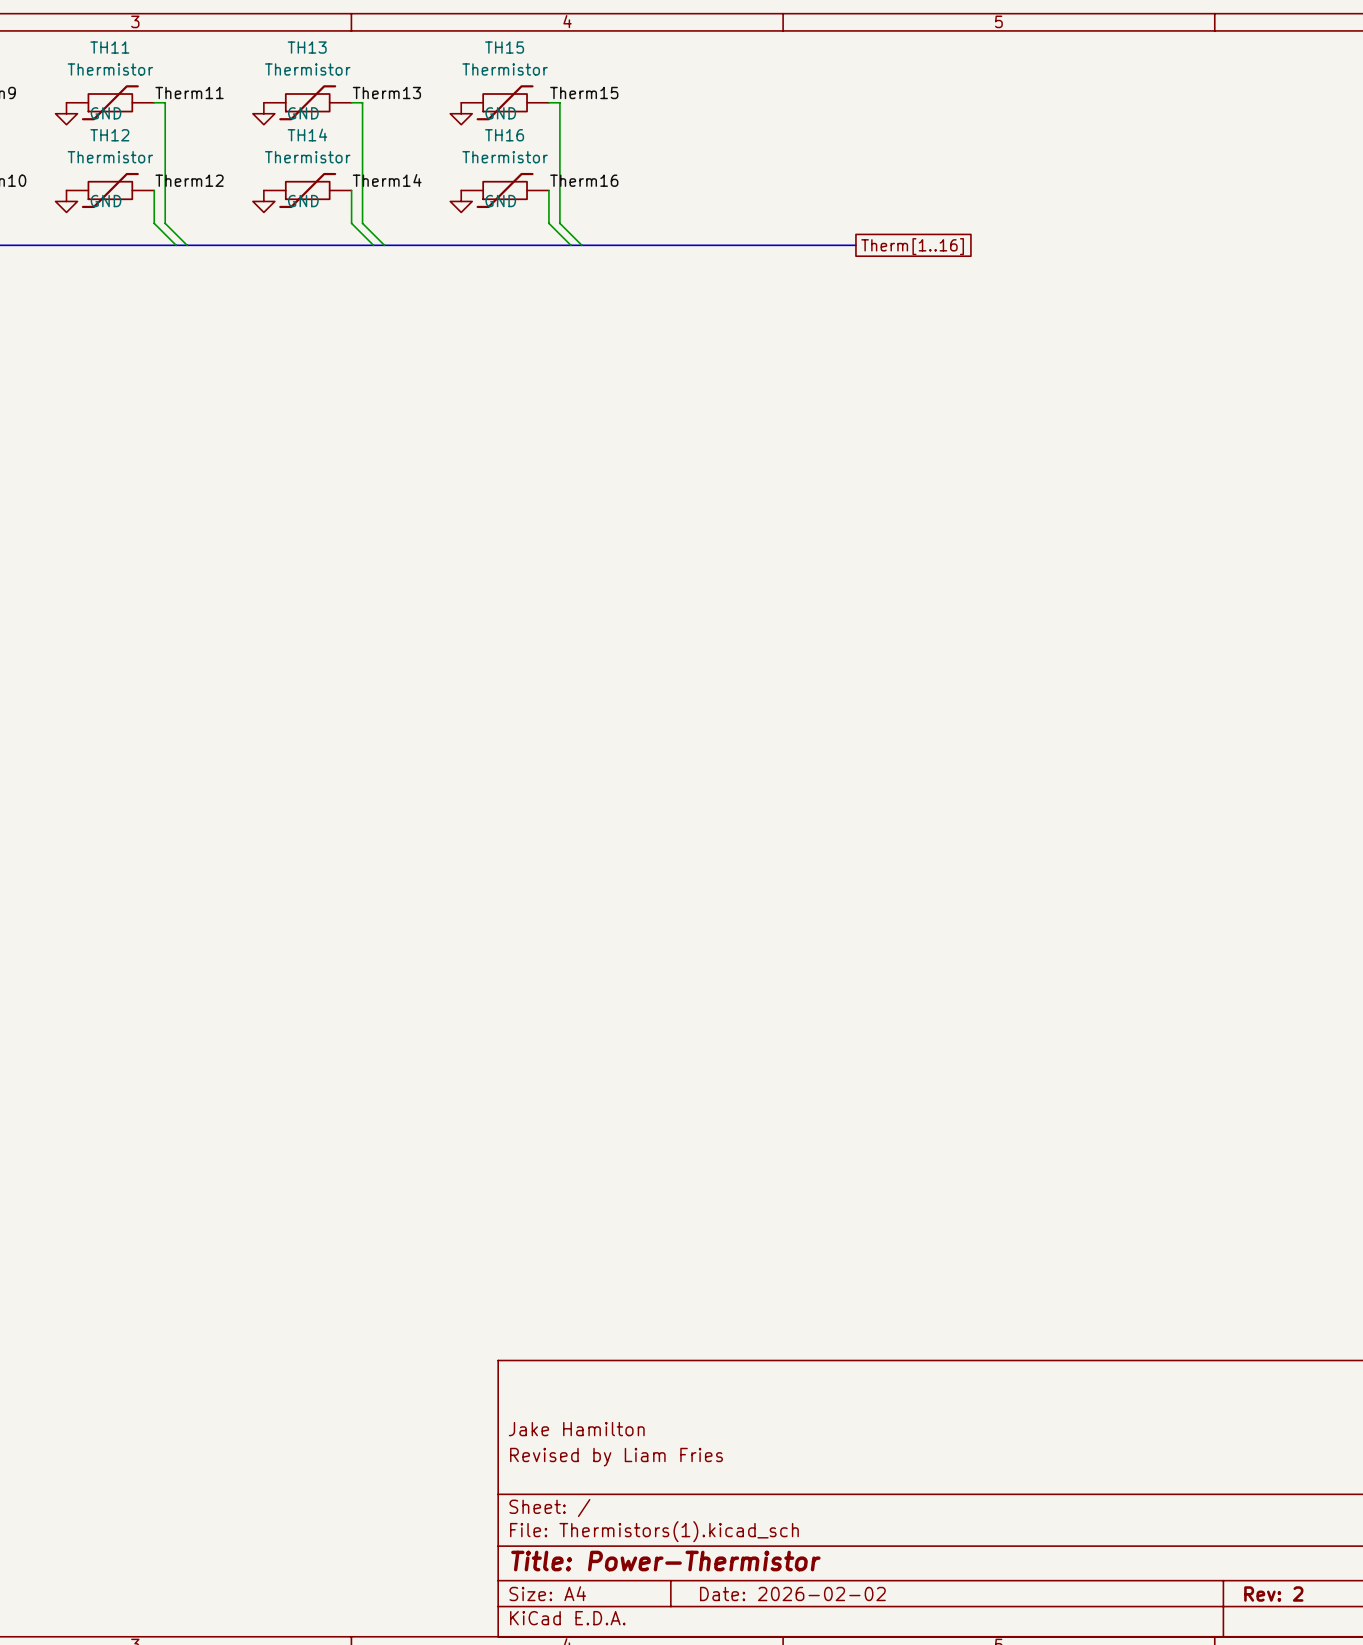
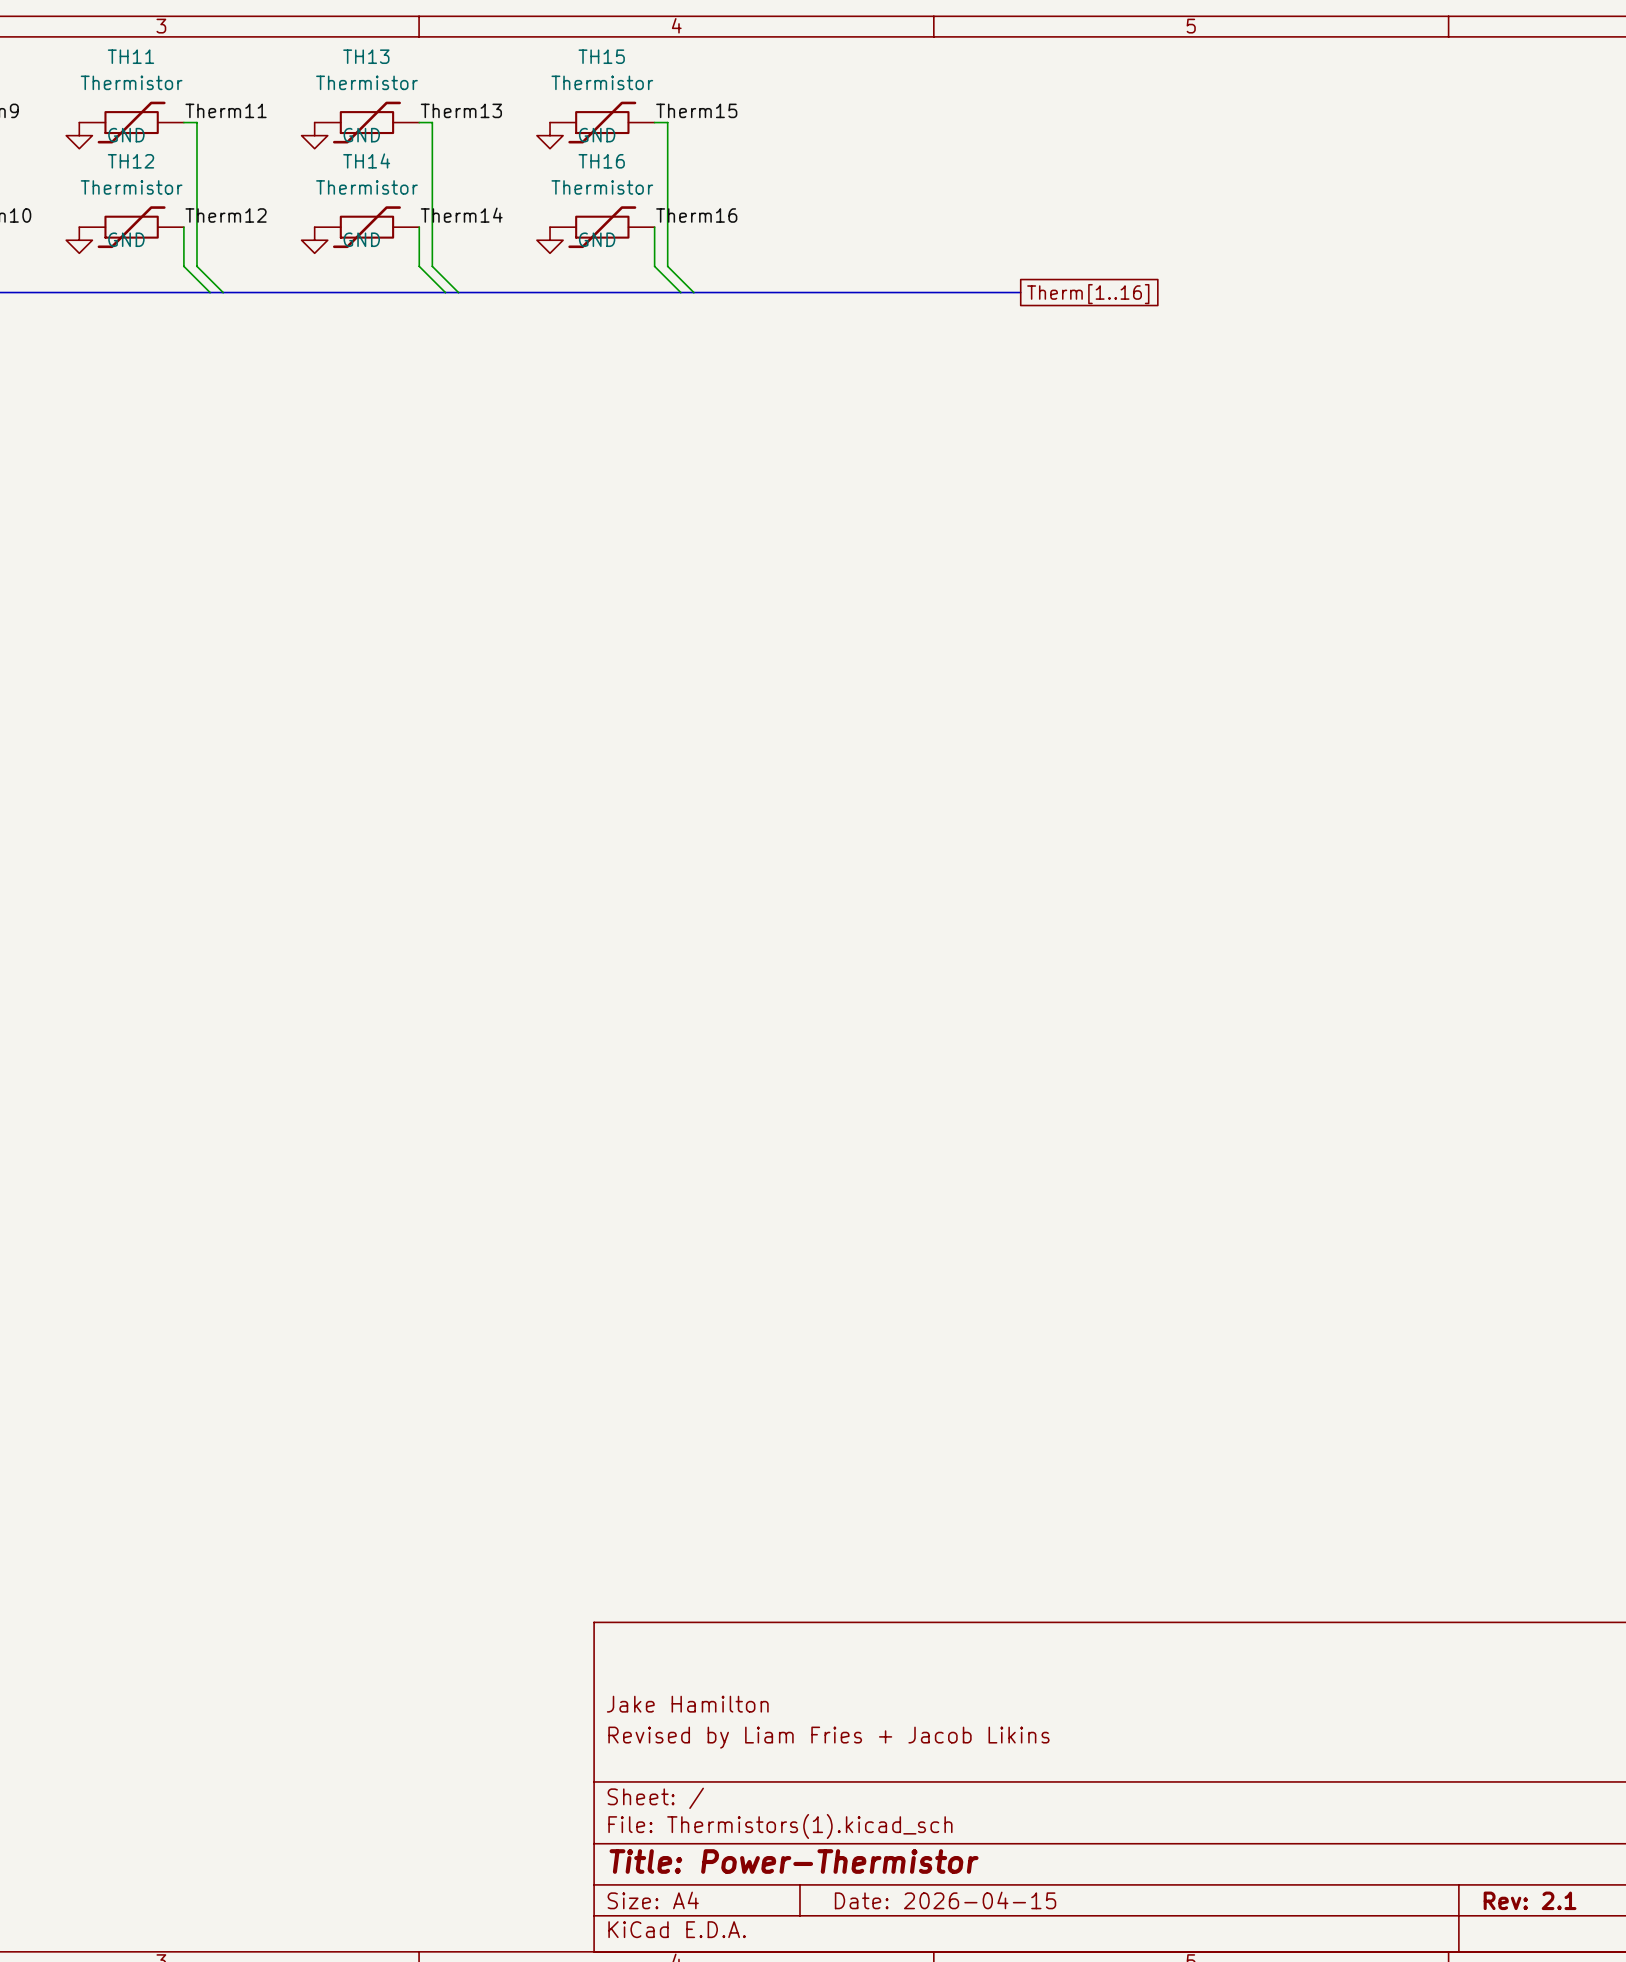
title block: Revised by Liam Fries (616, 1457) -> Revised by Liam Fries + Jacob Likins (828, 1737)
title block: Date: 2026-02-02 (792, 1593) -> Date: 2026-04-15 (945, 1900)
title block: Rev: 2 (1273, 1593) -> Rev: 2.1 (1530, 1900)

